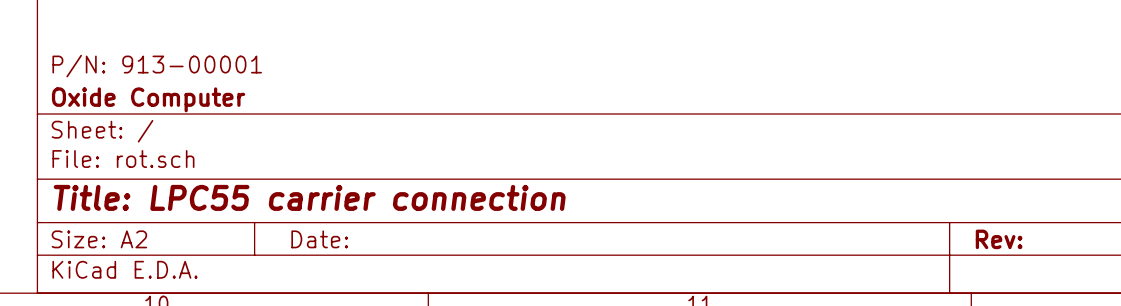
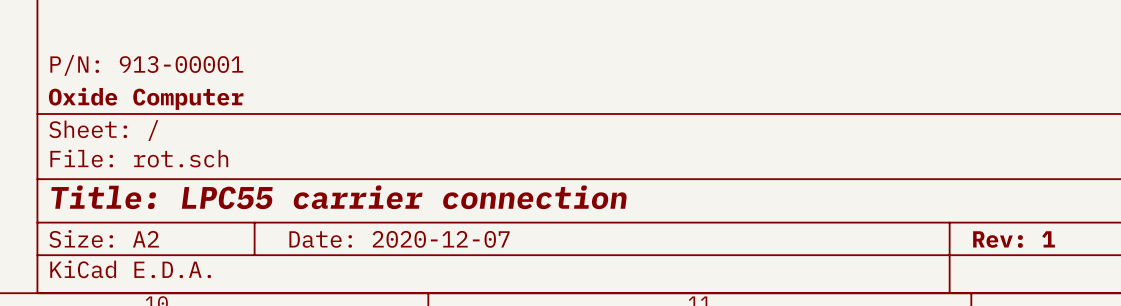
title block: Date: (319, 239) -> Date: 2020-12-07 (399, 239)
title block: Rev: (999, 239) -> Rev: 1 (1014, 239)

